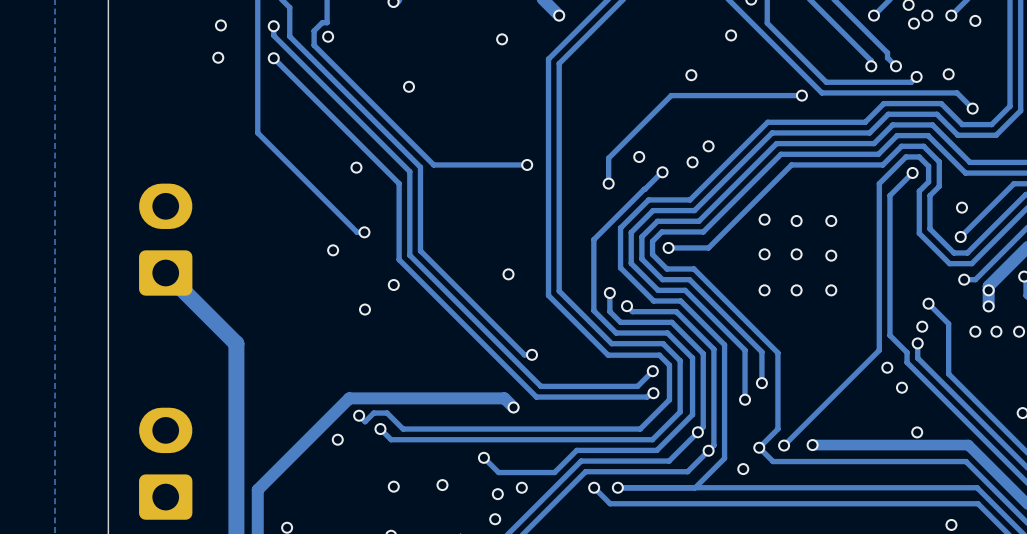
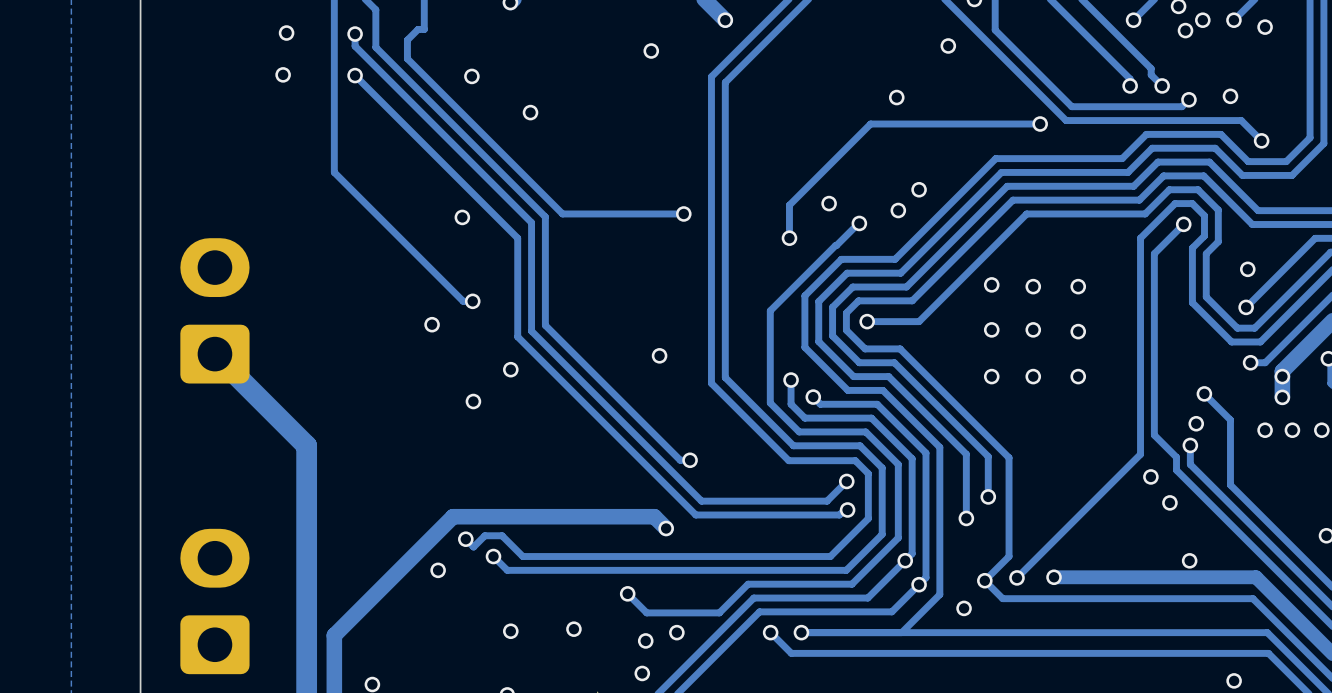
via position: (328, 36) -> (471, 76)

